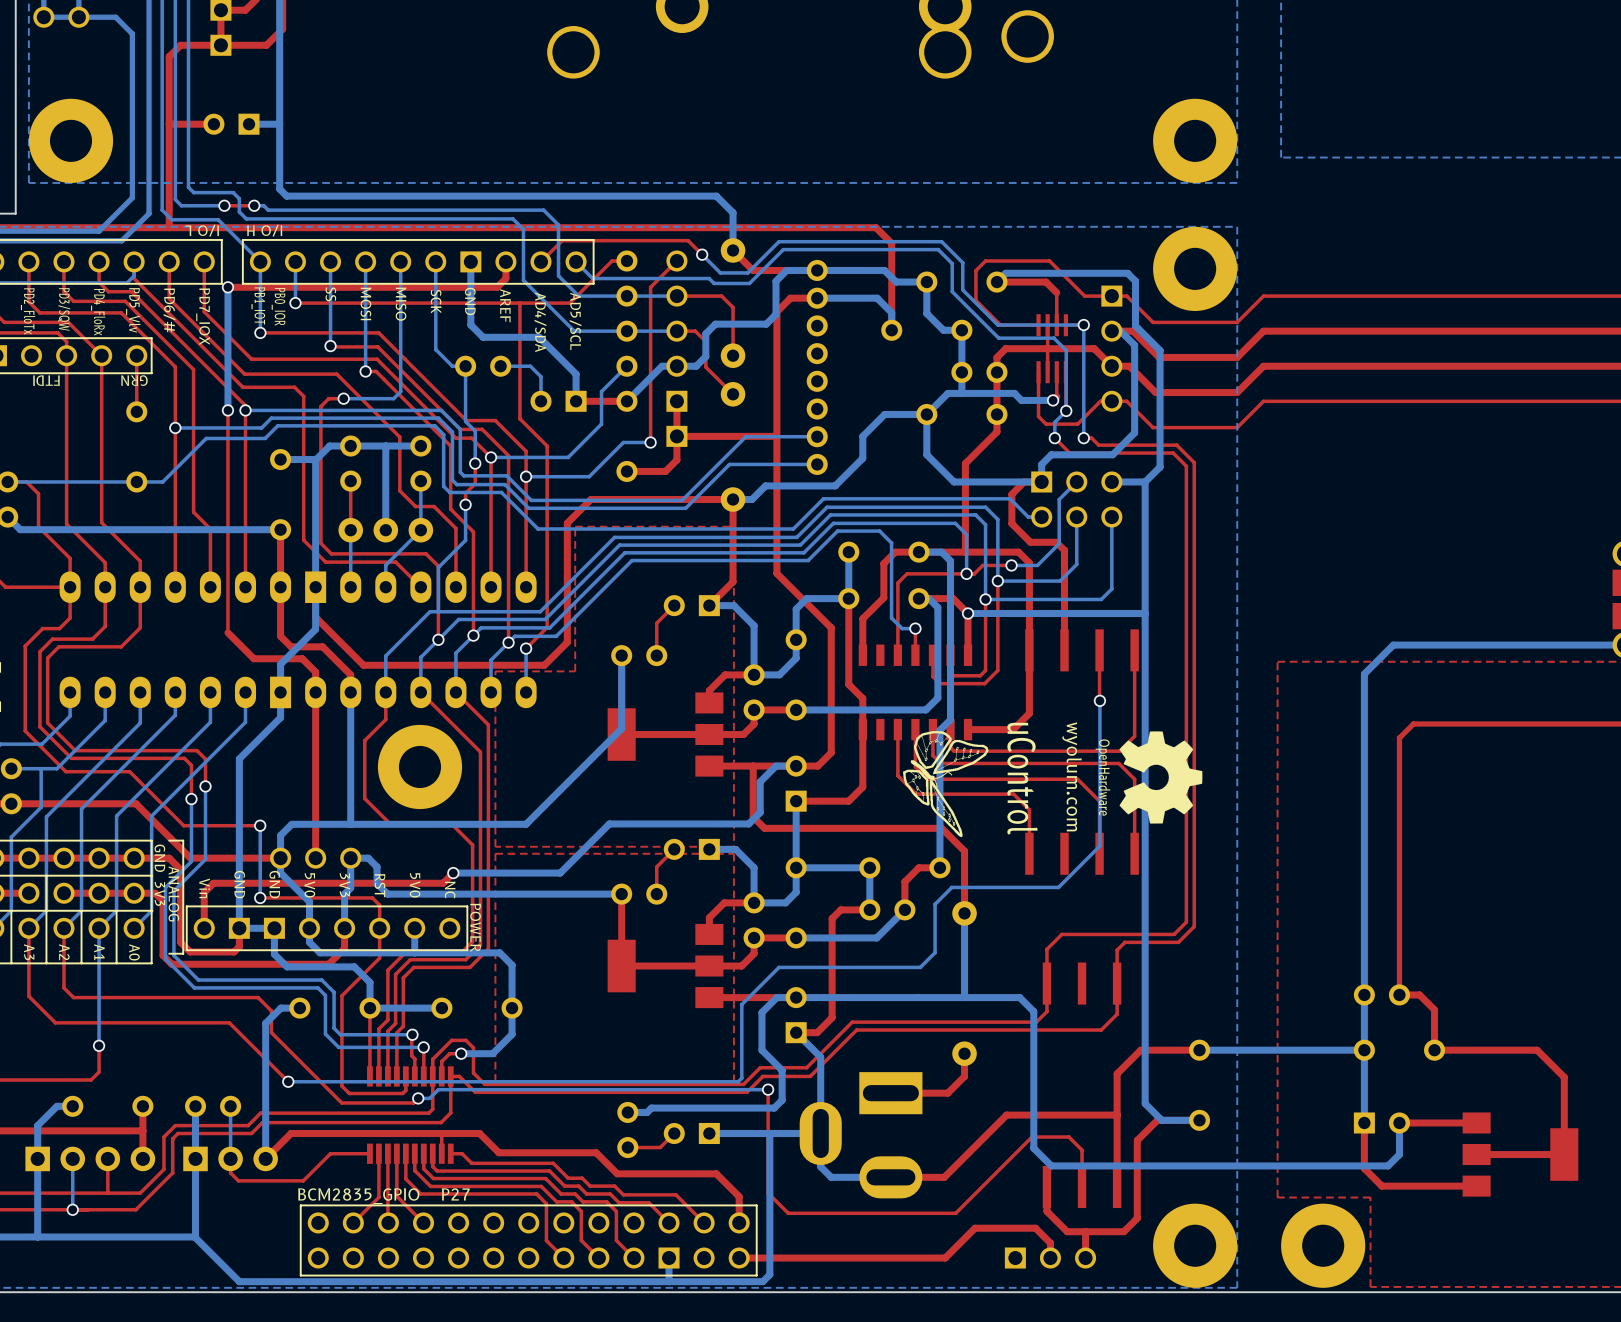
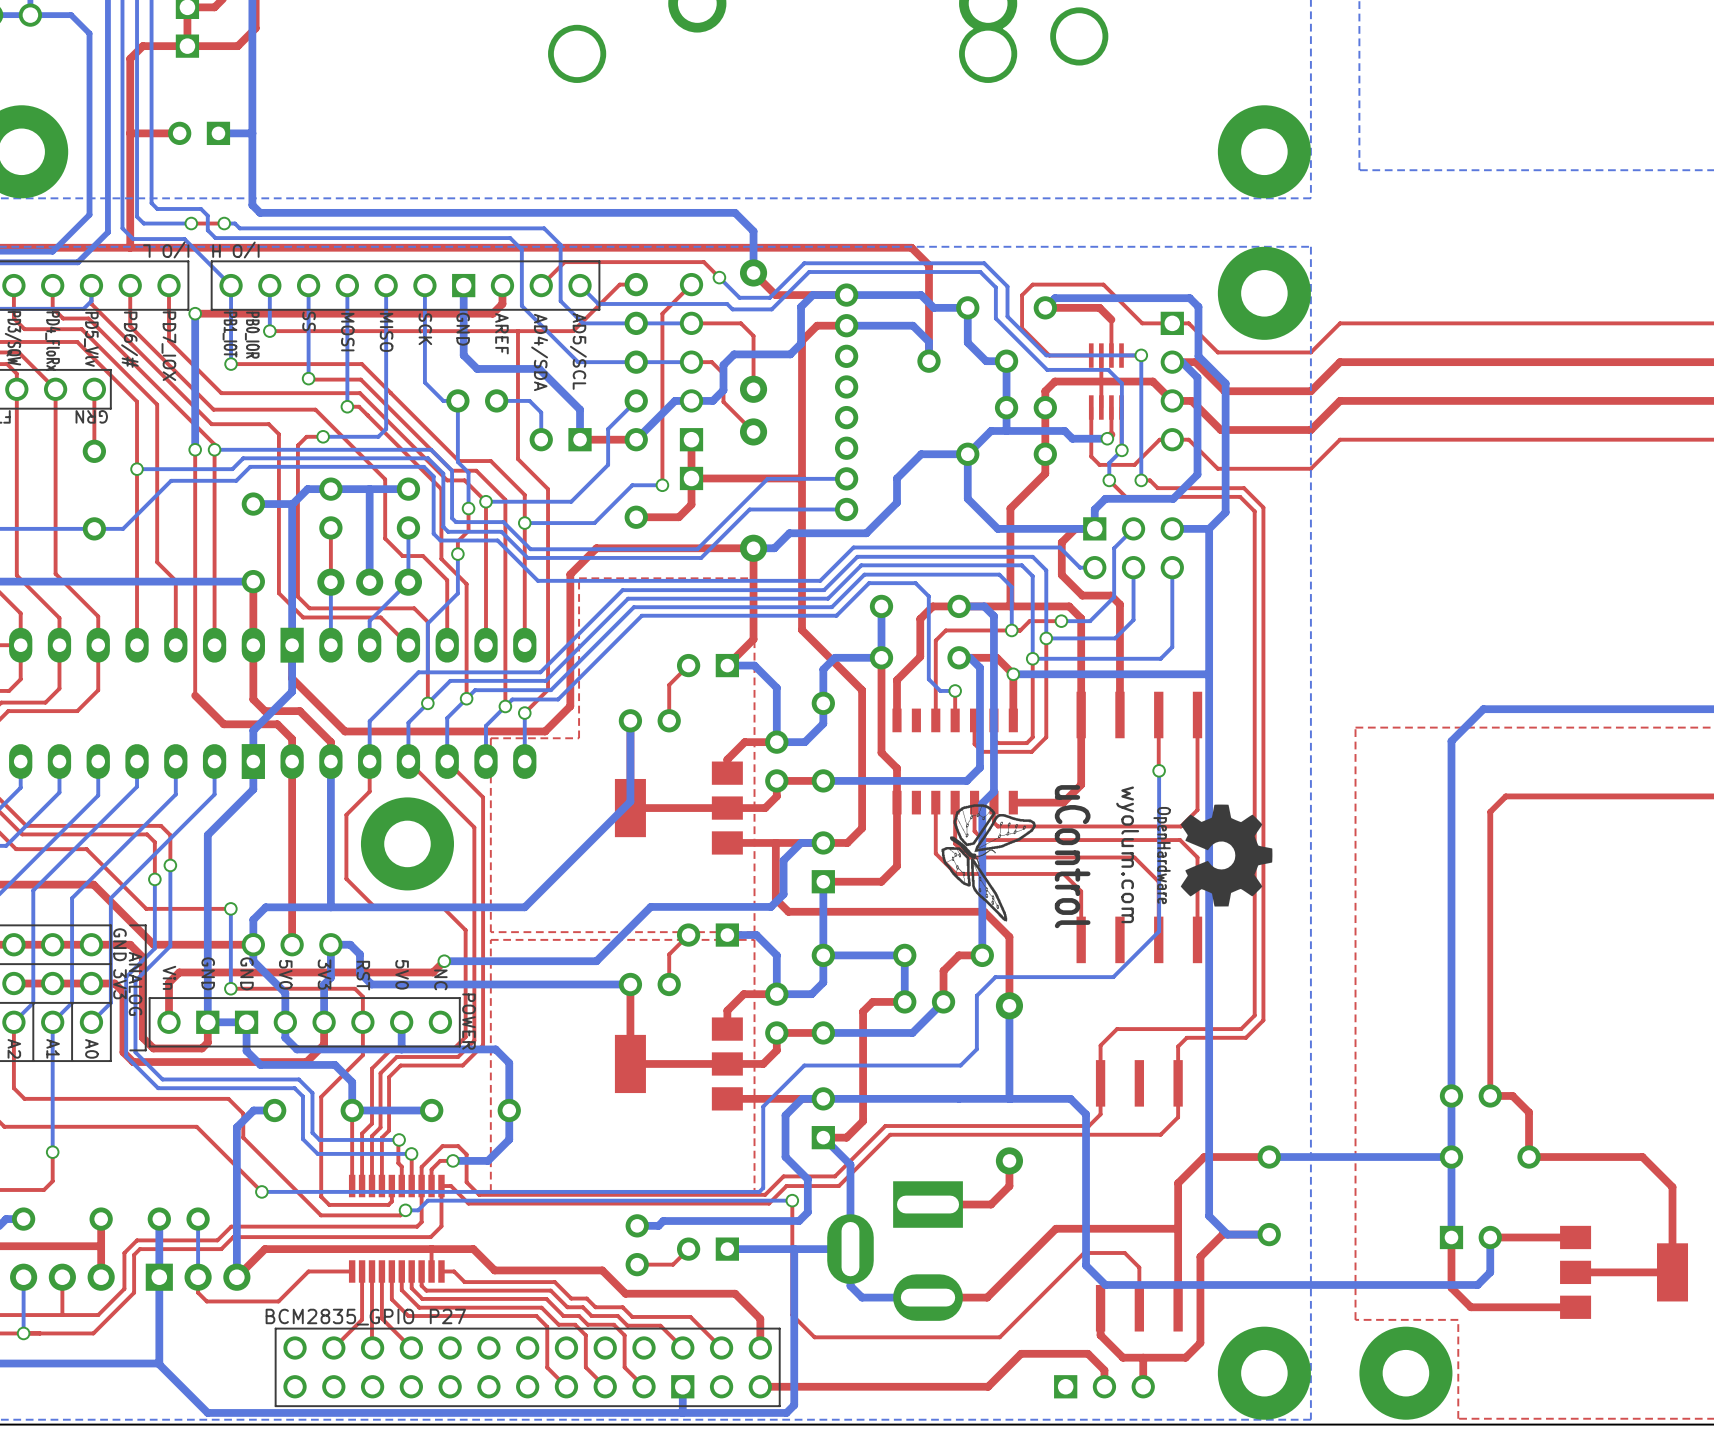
bottom track: (640, 823) (609, 823) (560, 873) -> (650, 906) (596, 961) (562, 961)

